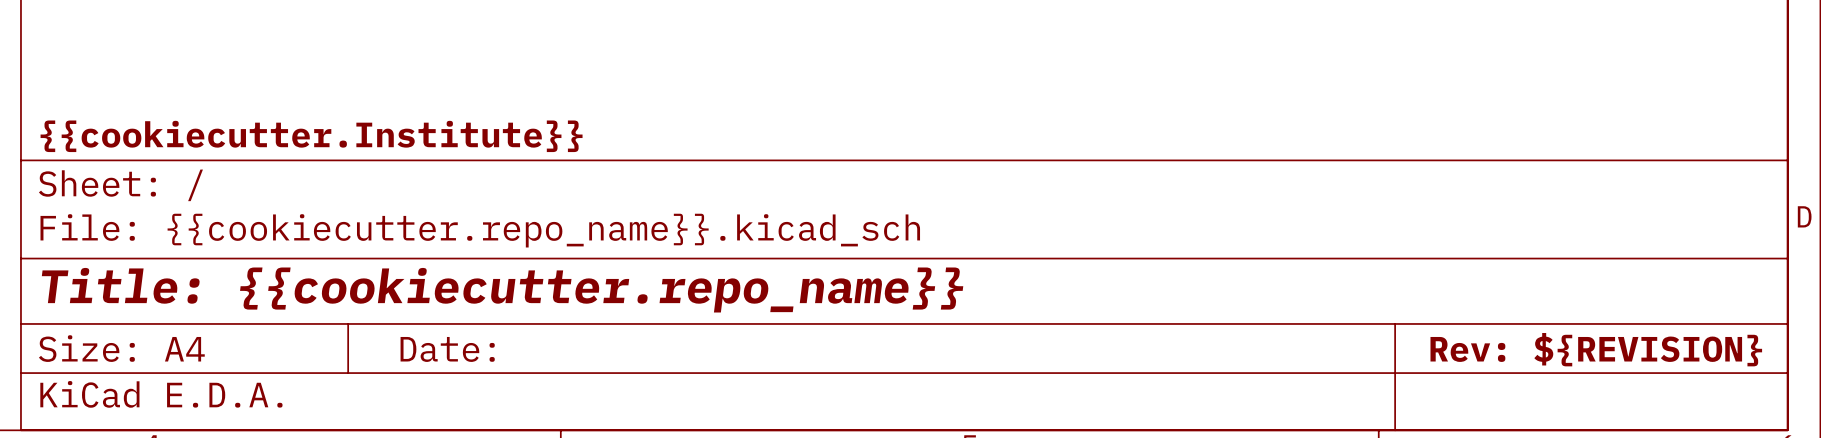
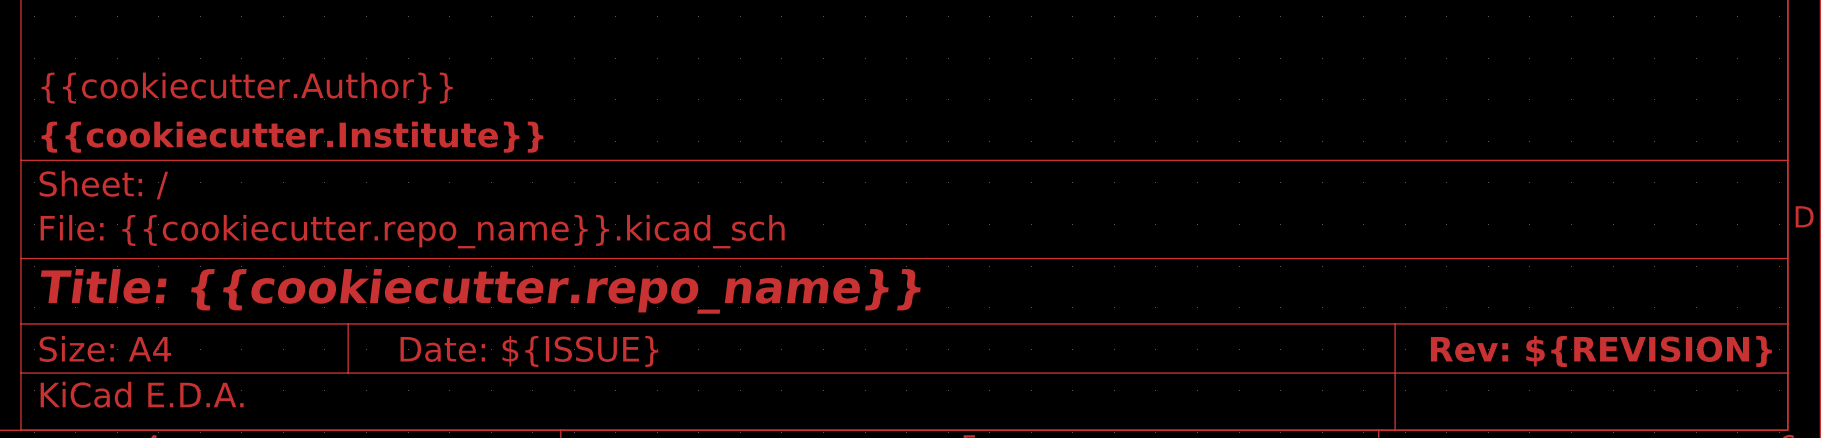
title block: none -> {{cookiecutter.Author}} (247, 88)
title block: Date: (447, 349) -> Date: ${ISSUE} (529, 351)

